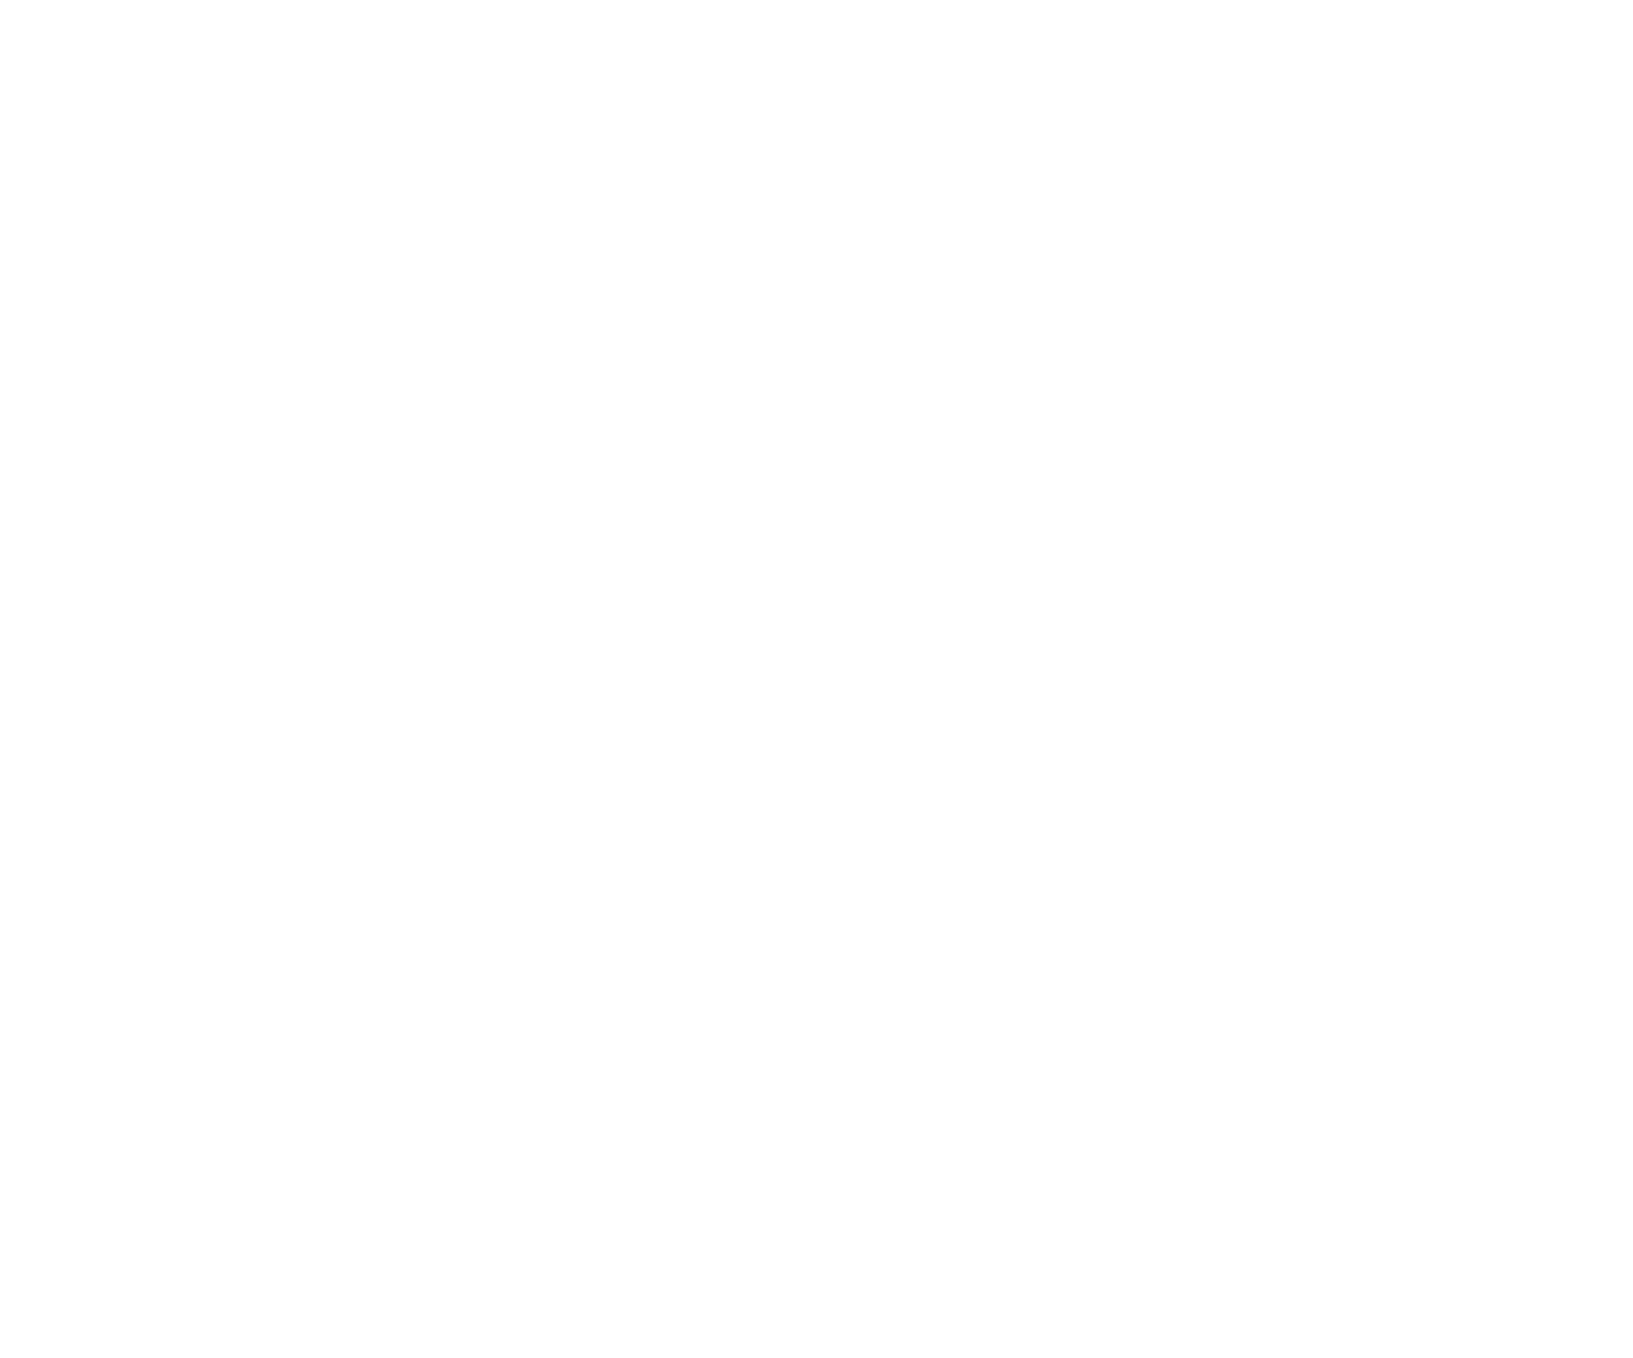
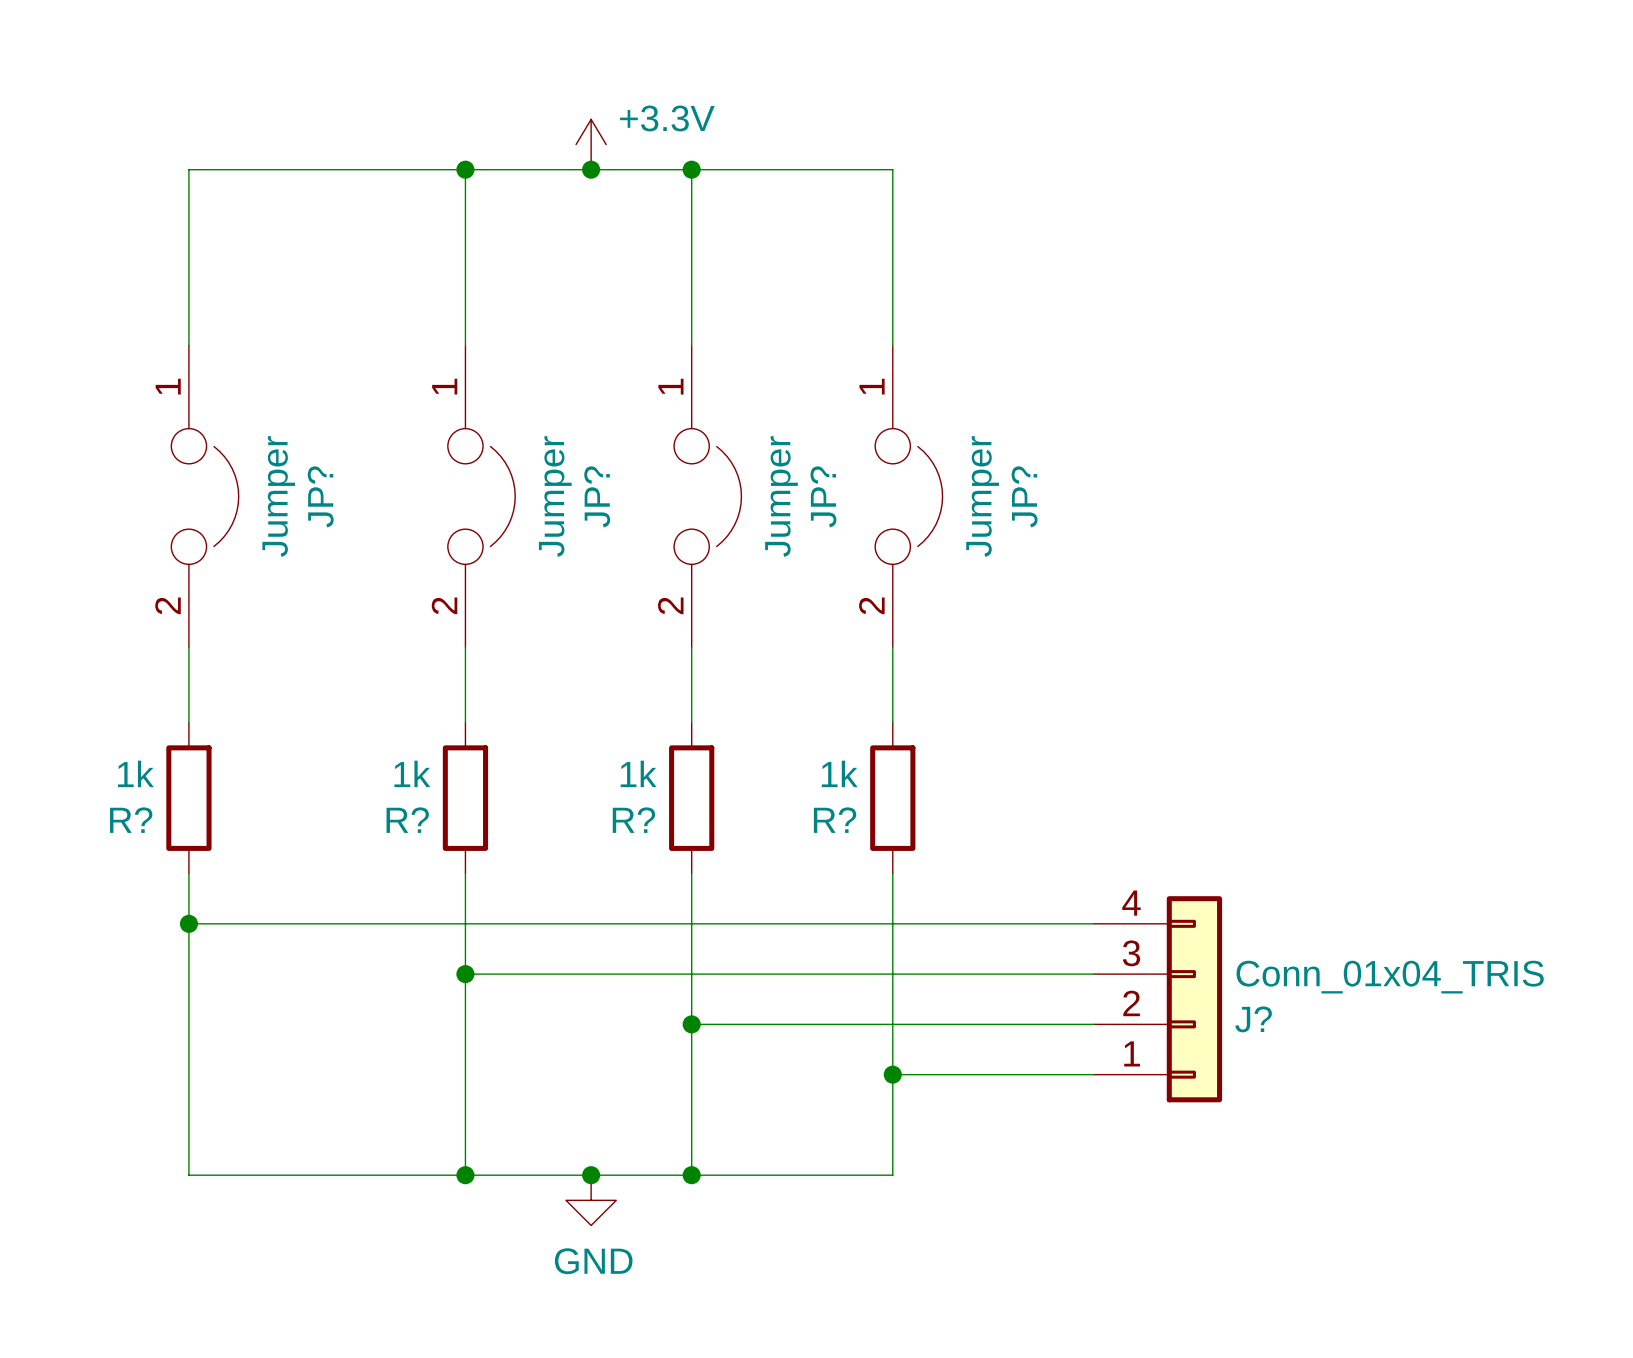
power symbol: none -> +3.3V (591, 144)
wire: none -> (465, 169) (465, 345)
junction: none -> (465, 169)
junction: none -> (591, 169)
wire: none -> (691, 169) (691, 345)
junction: none -> (691, 169)
wire: none -> (188, 345) (188, 169) (892, 169) (892, 345)
JP?: none -> Jumper (205, 496)
JP?: none -> Jumper (481, 496)
JP?: none -> Jumper (707, 496)
JP?: none -> Jumper (908, 496)
wire: none -> (188, 647) (188, 722)
wire: none -> (465, 647) (465, 722)
wire: none -> (691, 647) (691, 722)
wire: none -> (892, 647) (892, 722)
R?: none -> 1k (188, 798)
R?: none -> 1k (465, 798)
R?: none -> 1k (691, 798)
R?: none -> 1k (892, 798)
wire: none -> (188, 873) (188, 1175) (892, 1175) (892, 873)
wire: none -> (465, 873) (465, 1175)
wire: none -> (691, 873) (691, 1175)
wire: none -> (188, 923) (1093, 923)
junction: none -> (188, 923)
wire: none -> (465, 974) (1093, 974)
junction: none -> (465, 974)
J?: none -> Conn_01x04_TRIS (1157, 999)
wire: none -> (691, 1024) (1093, 1024)
junction: none -> (691, 1024)
wire: none -> (892, 1074) (1093, 1074)
junction: none -> (892, 1074)
junction: none -> (465, 1175)
junction: none -> (591, 1175)
junction: none -> (691, 1175)
power symbol: none -> GND (591, 1200)

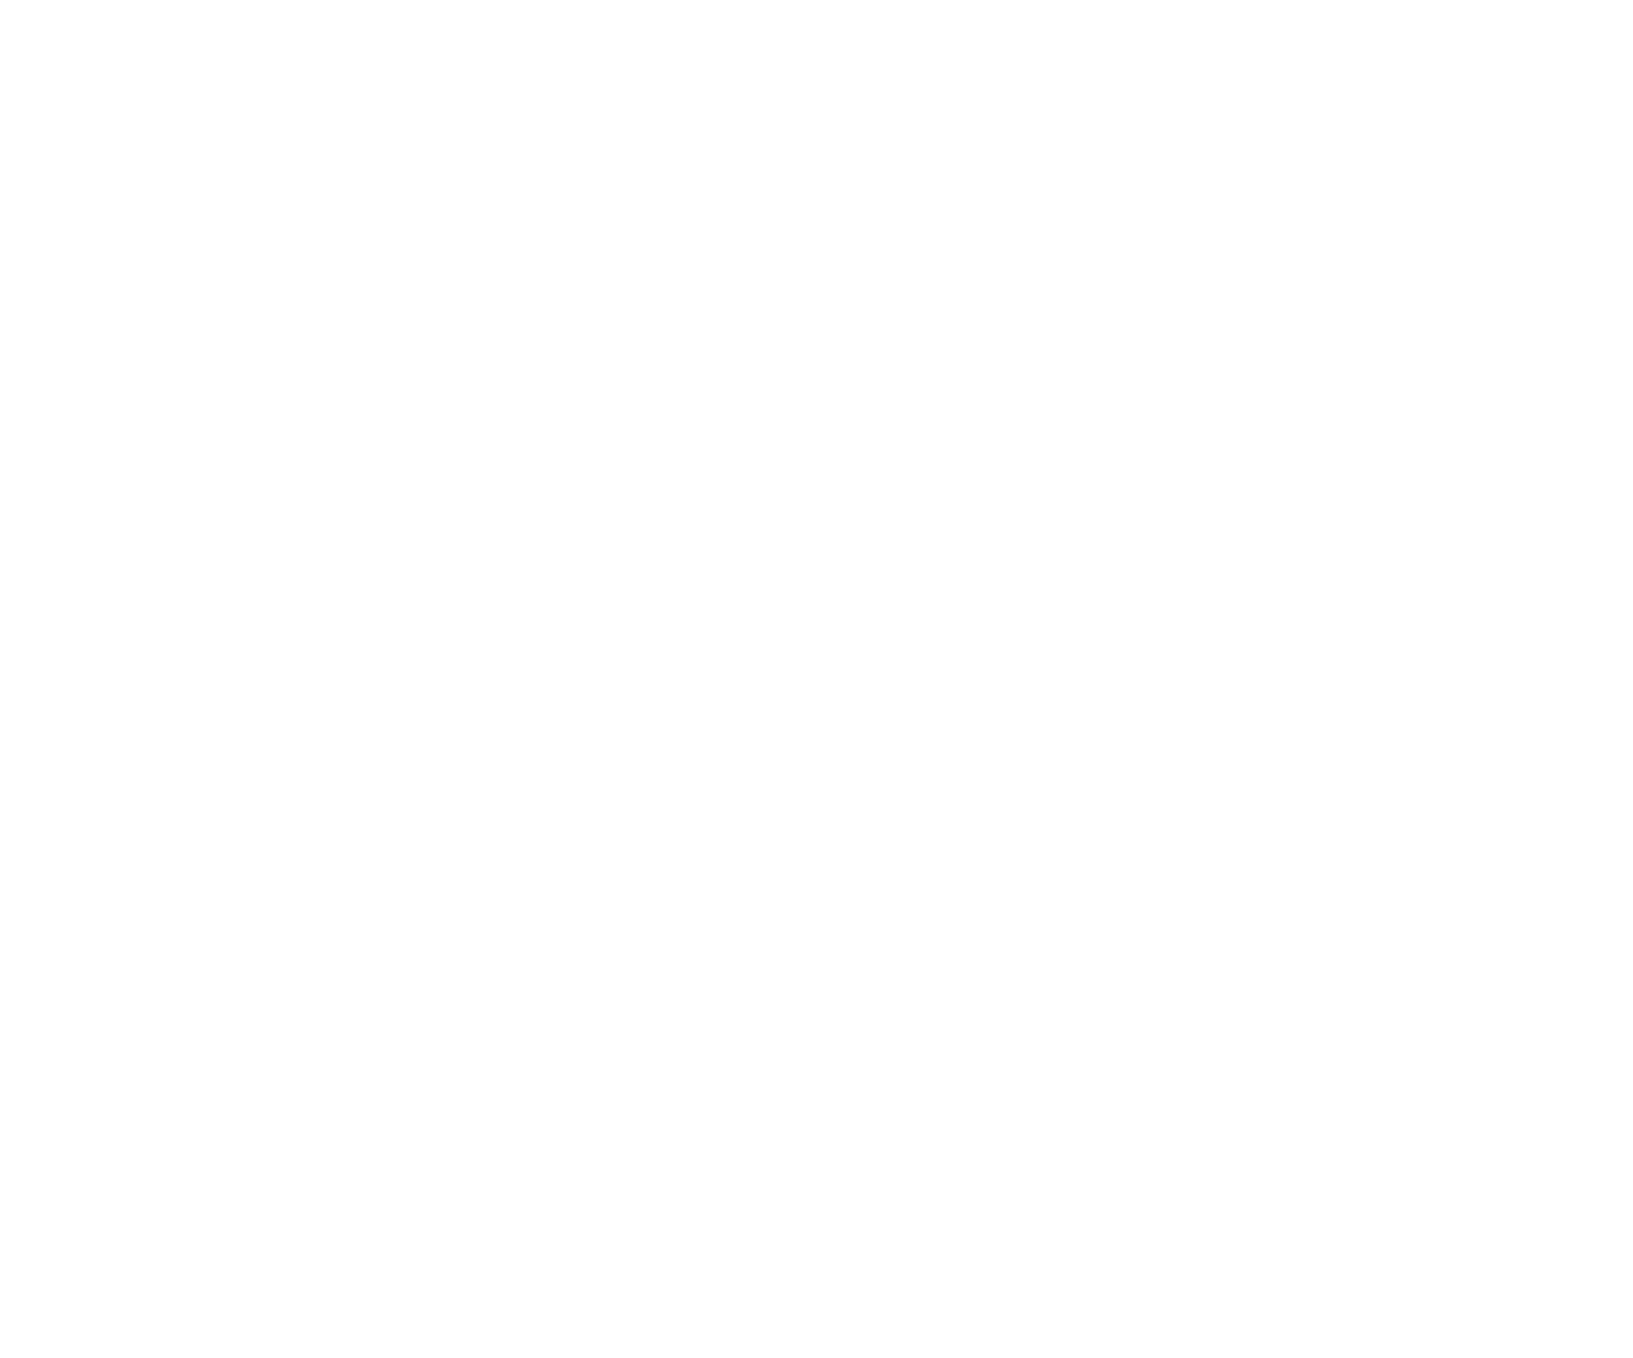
power symbol: +3.3V (591, 144) -> none
wire: (465, 169) (465, 345) -> none
junction: (465, 169) -> none
junction: (591, 169) -> none
wire: (691, 169) (691, 345) -> none
junction: (691, 169) -> none
wire: (188, 345) (188, 169) (892, 169) (892, 345) -> none
JP?: Jumper (205, 496) -> none
JP?: Jumper (481, 496) -> none
JP?: Jumper (707, 496) -> none
JP?: Jumper (908, 496) -> none
wire: (188, 647) (188, 722) -> none
wire: (465, 647) (465, 722) -> none
wire: (691, 647) (691, 722) -> none
wire: (892, 647) (892, 722) -> none
R?: 1k (188, 798) -> none
R?: 1k (465, 798) -> none
R?: 1k (691, 798) -> none
R?: 1k (892, 798) -> none
wire: (188, 873) (188, 1175) (892, 1175) (892, 873) -> none
wire: (465, 873) (465, 1175) -> none
wire: (691, 873) (691, 1175) -> none
wire: (188, 923) (1093, 923) -> none
junction: (188, 923) -> none
wire: (465, 974) (1093, 974) -> none
junction: (465, 974) -> none
J?: Conn_01x04_TRIS (1157, 999) -> none
wire: (691, 1024) (1093, 1024) -> none
junction: (691, 1024) -> none
wire: (892, 1074) (1093, 1074) -> none
junction: (892, 1074) -> none
junction: (465, 1175) -> none
junction: (591, 1175) -> none
junction: (691, 1175) -> none
power symbol: GND (591, 1200) -> none

